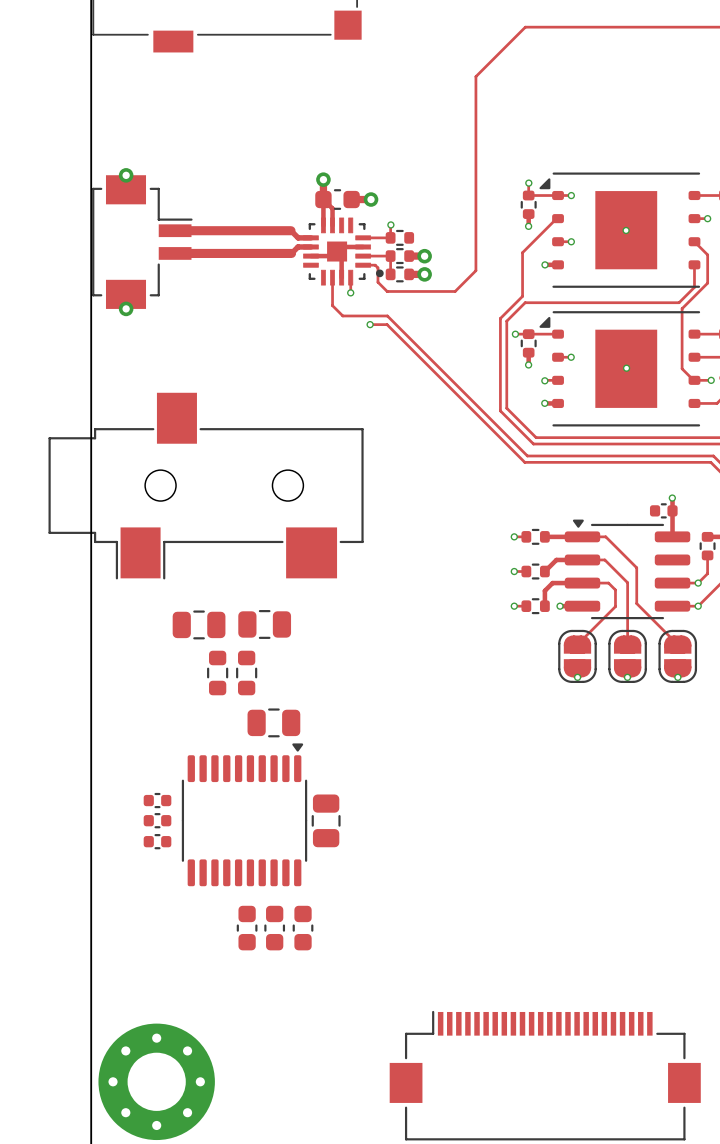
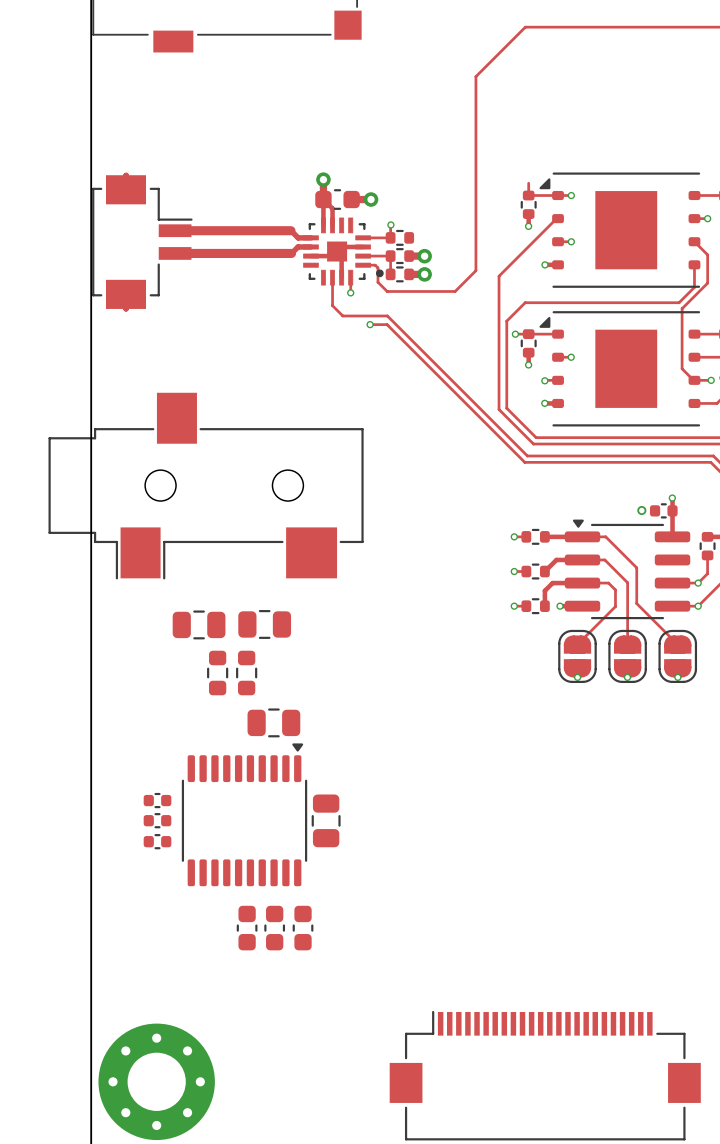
via: (126, 175) -> none
via: (528, 183) -> none
via: (626, 230) -> none
track: (522, 252) (522, 296) (500, 318) (500, 410) -> (522, 252) (499, 276) (500, 410)
via: (126, 308) -> none
via: (626, 368) -> none
via: none -> (641, 510)

